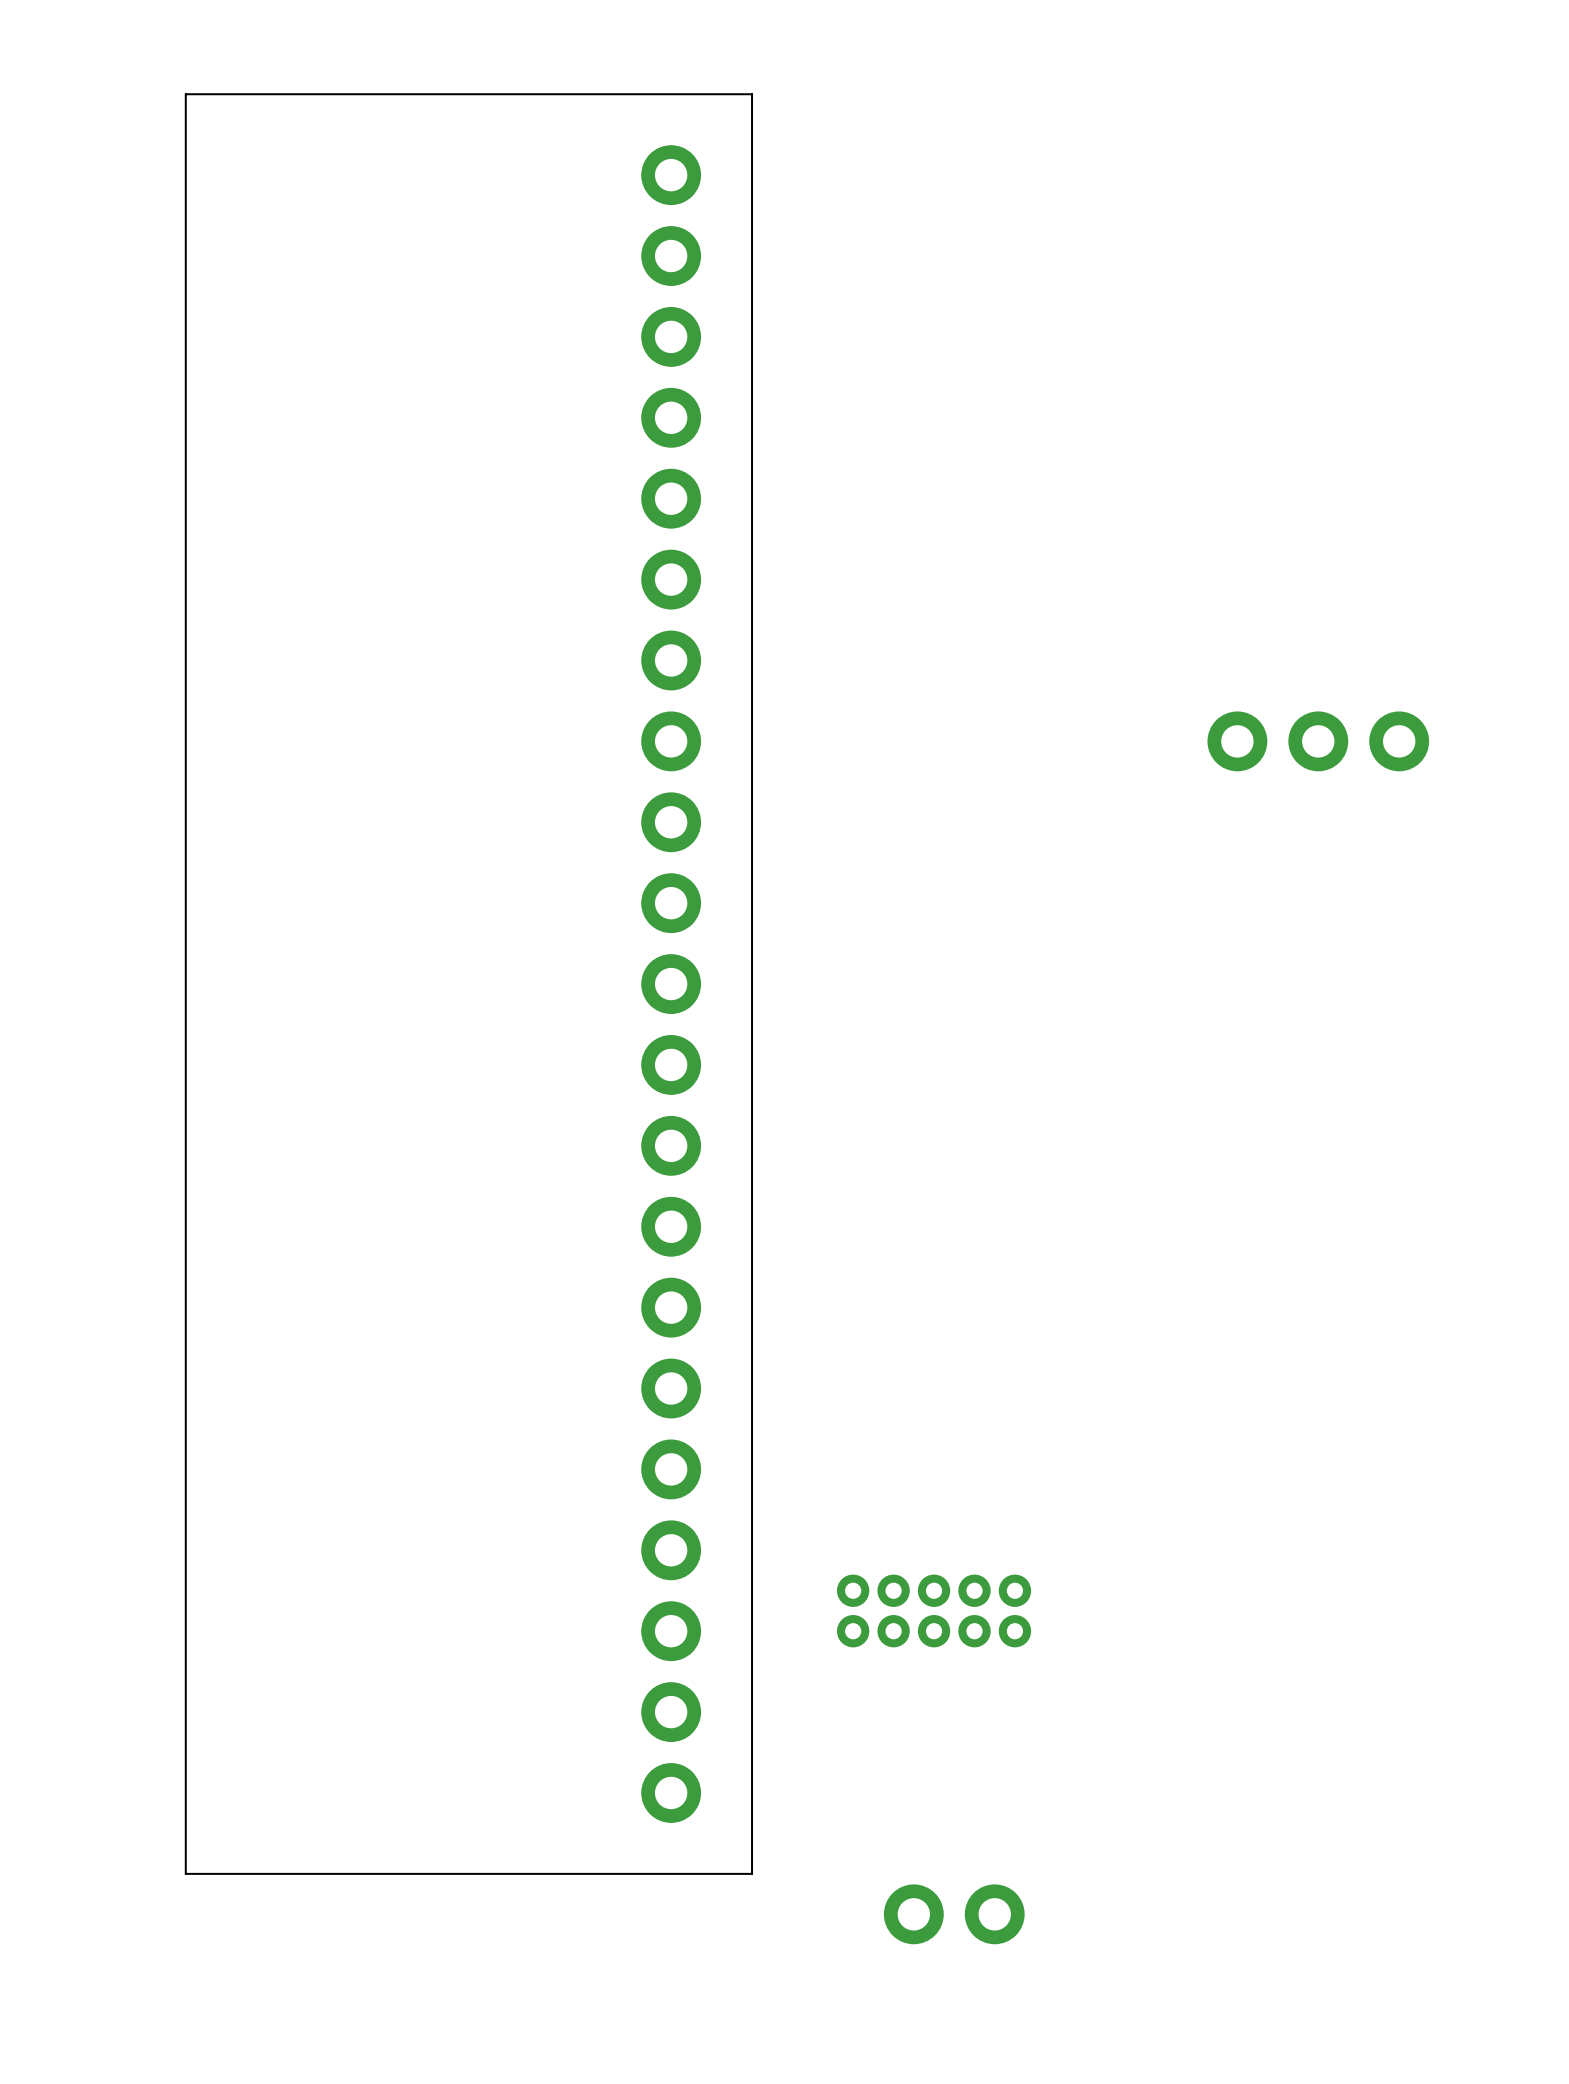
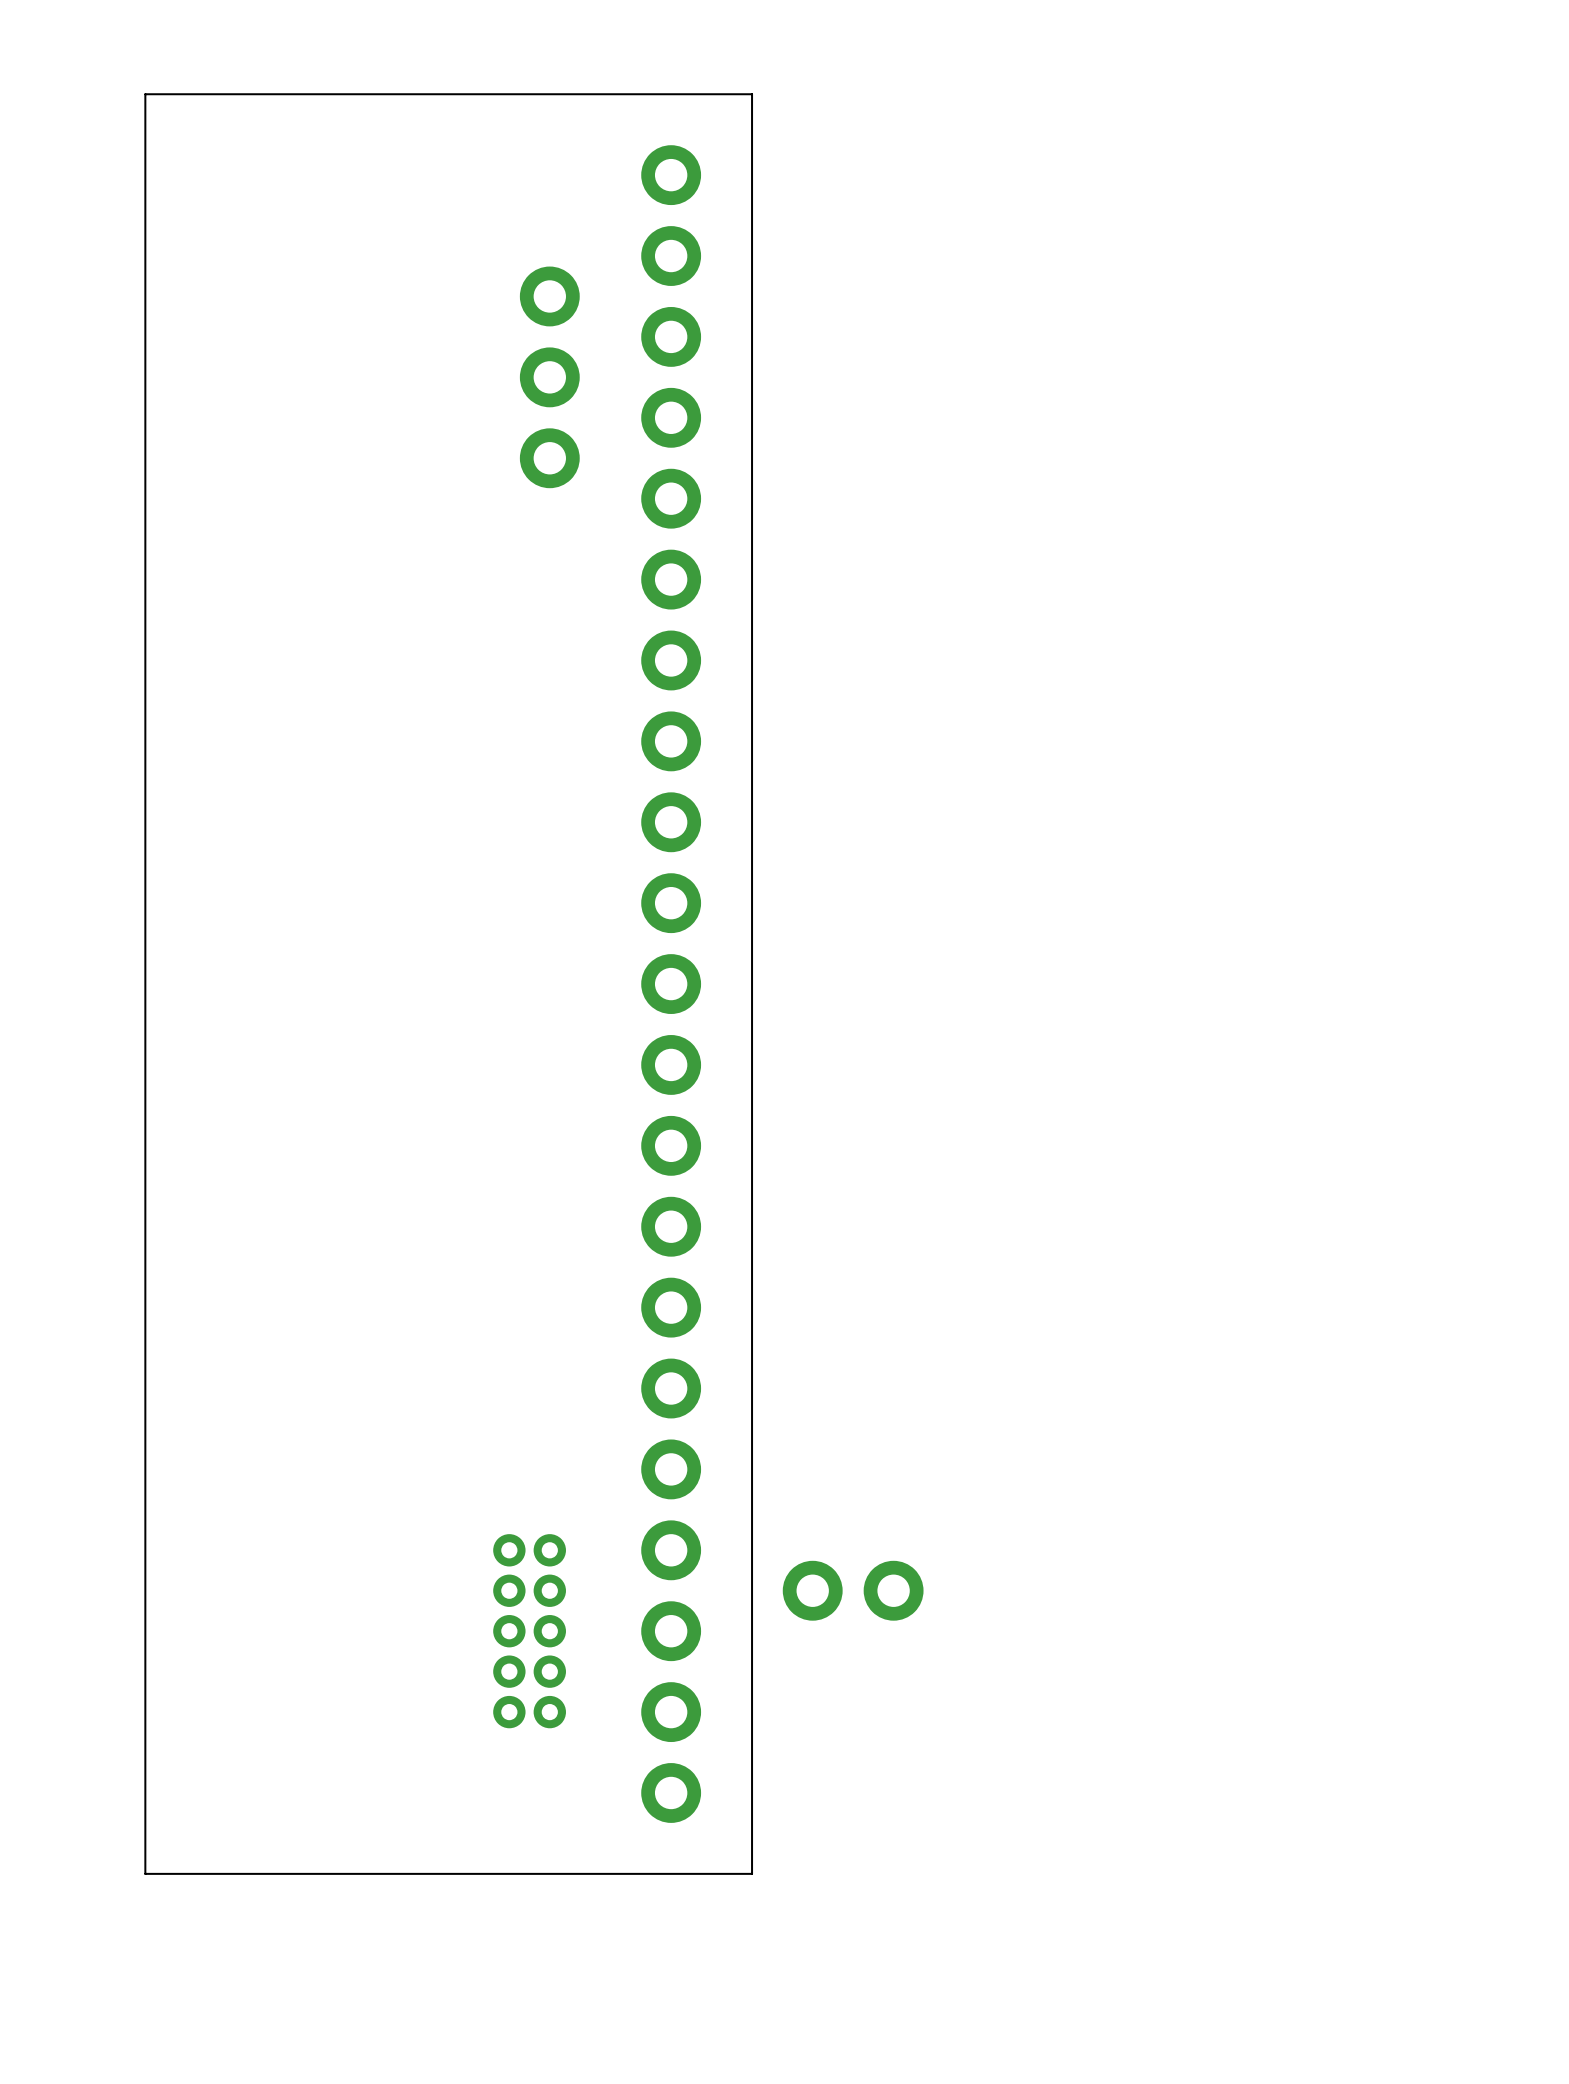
board edge: (185, 94) (185, 1873) -> (185, 94) (145, 94) (145, 1873) (185, 1873)
part: none -> (549, 377)
part: (1318, 741) -> none
part rotation: 0° (934, 1610) -> 90° clockwise (529, 1631)
part position: (934, 1610) -> (529, 1631)
part position: (954, 1914) -> (853, 1590)

